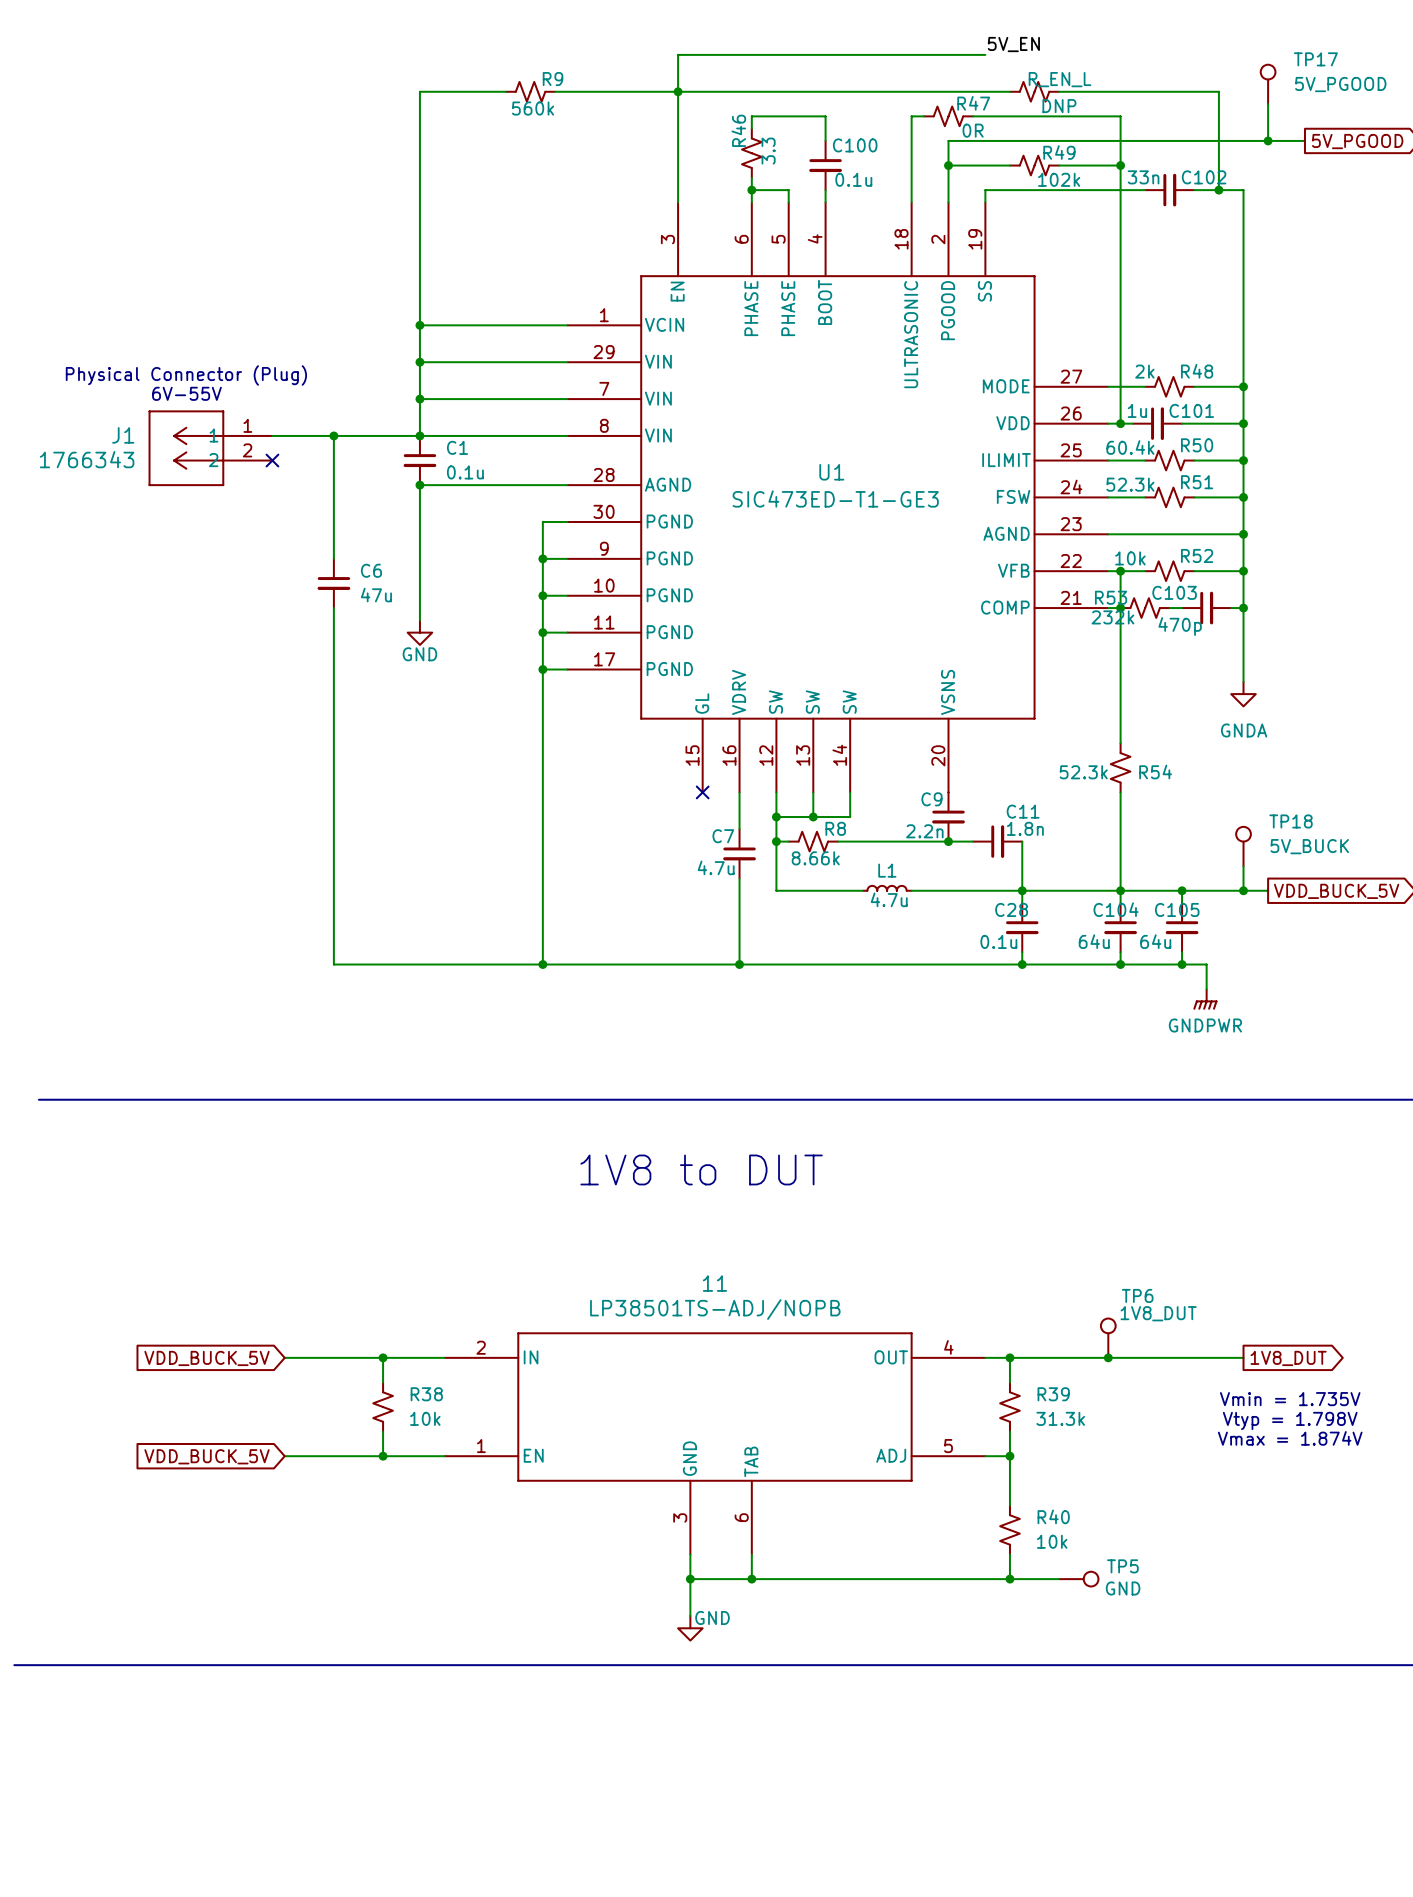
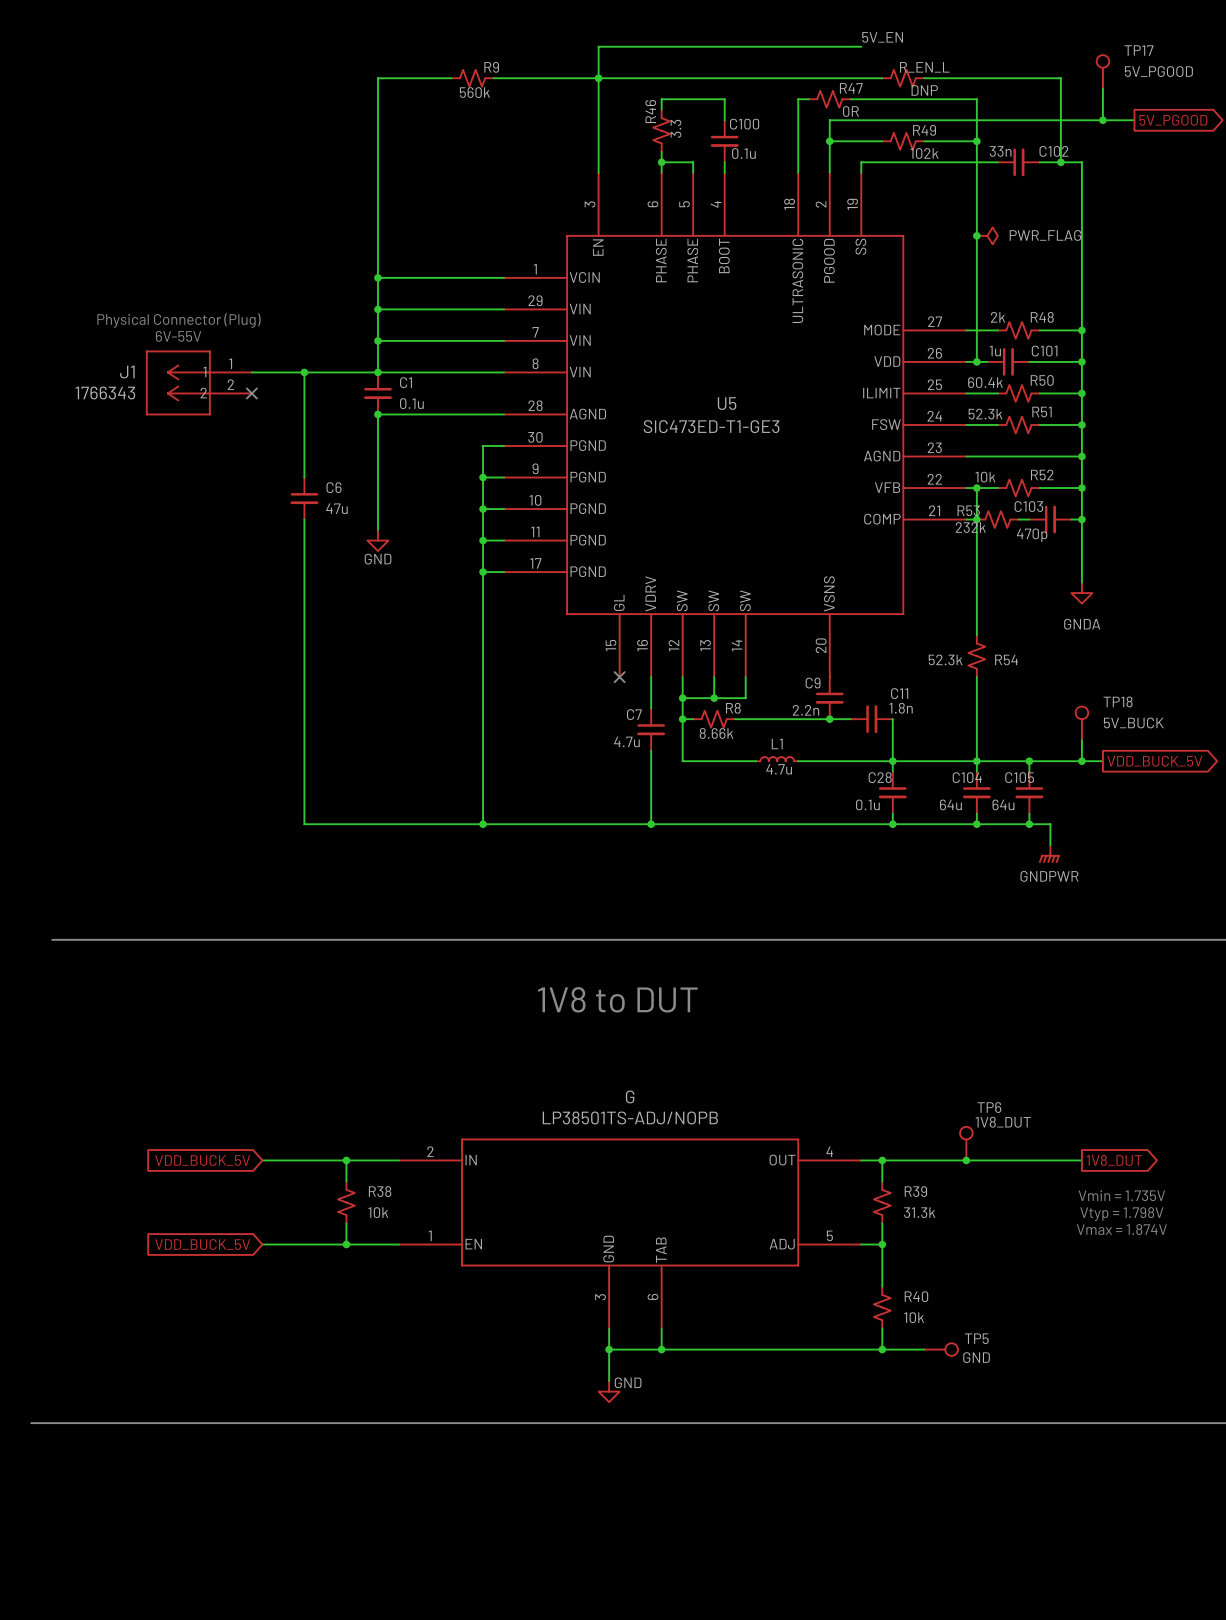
junction: none -> (976, 235)
power symbol: none -> PWR_FLAG (987, 235)
U1 name: U1 (831, 472) -> U5 (727, 403)
11 name: 11 (714, 1283) -> G (630, 1096)

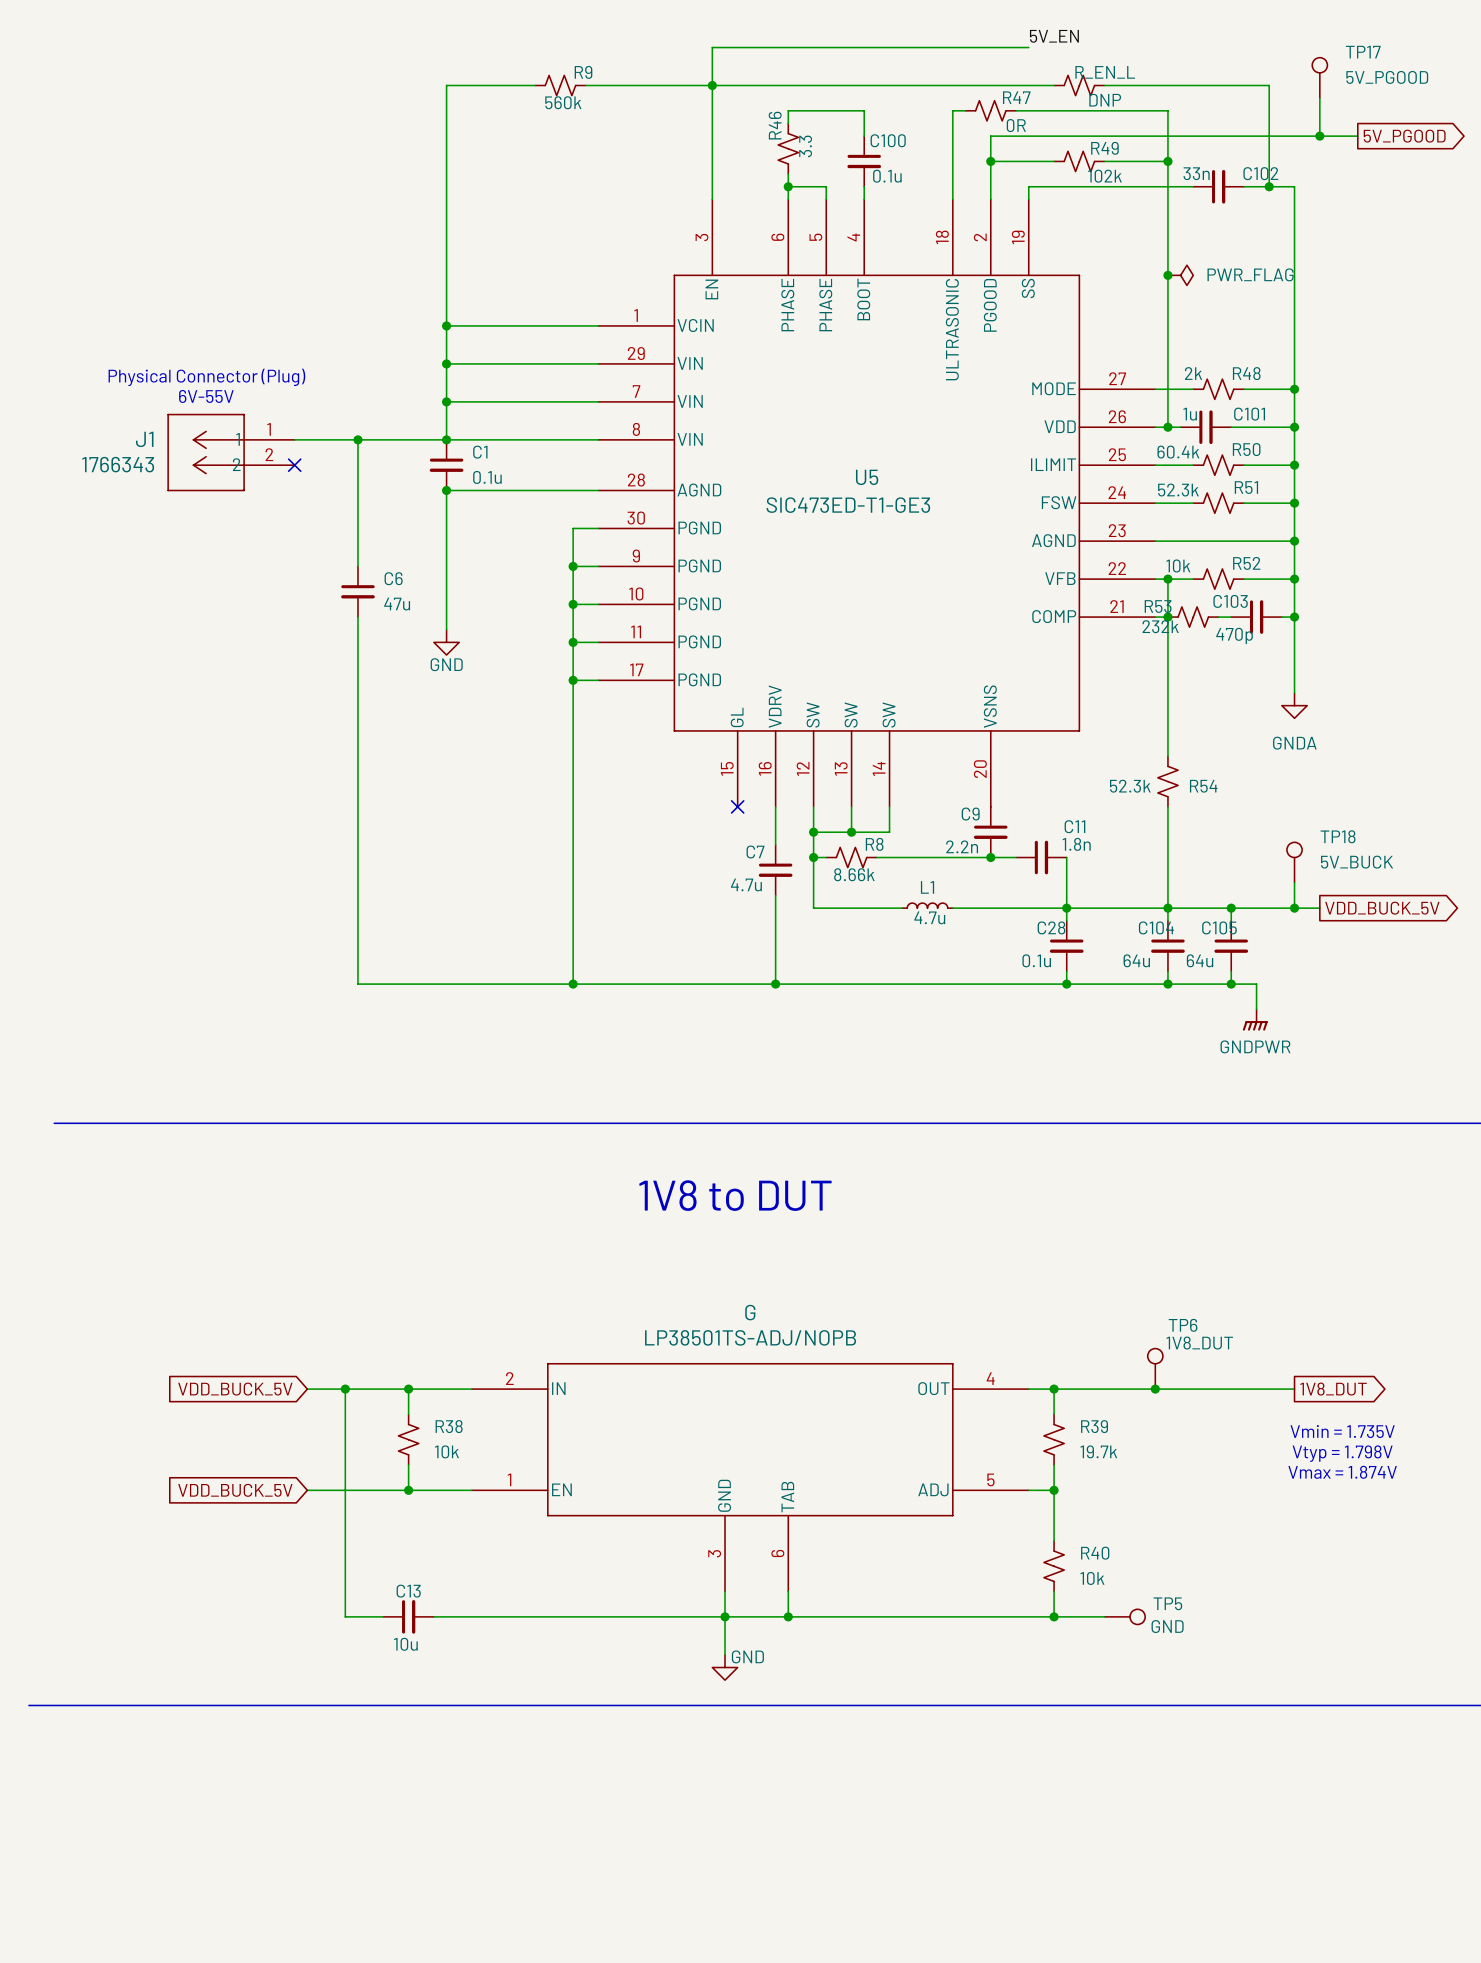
wire: none -> (345, 1389) (345, 1616) (383, 1616)
junction: none -> (345, 1389)
R39 value: 31.3k (919, 1212) -> 19.7k (1098, 1451)
C13: none -> 10u (408, 1616)
wire: none -> (433, 1616) (725, 1616)

